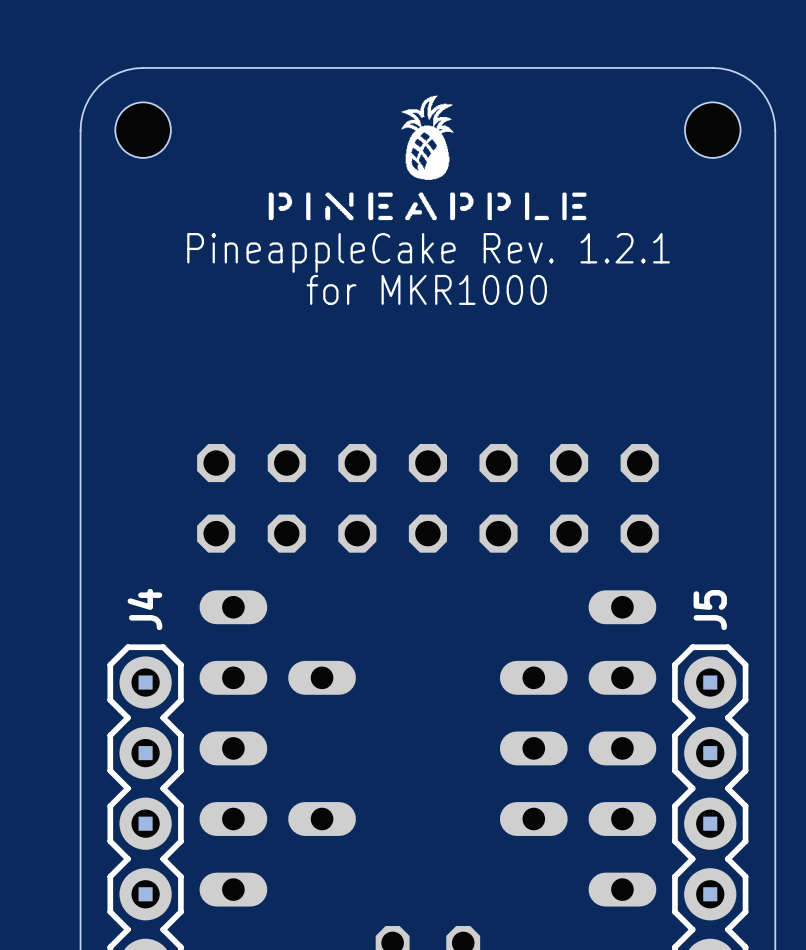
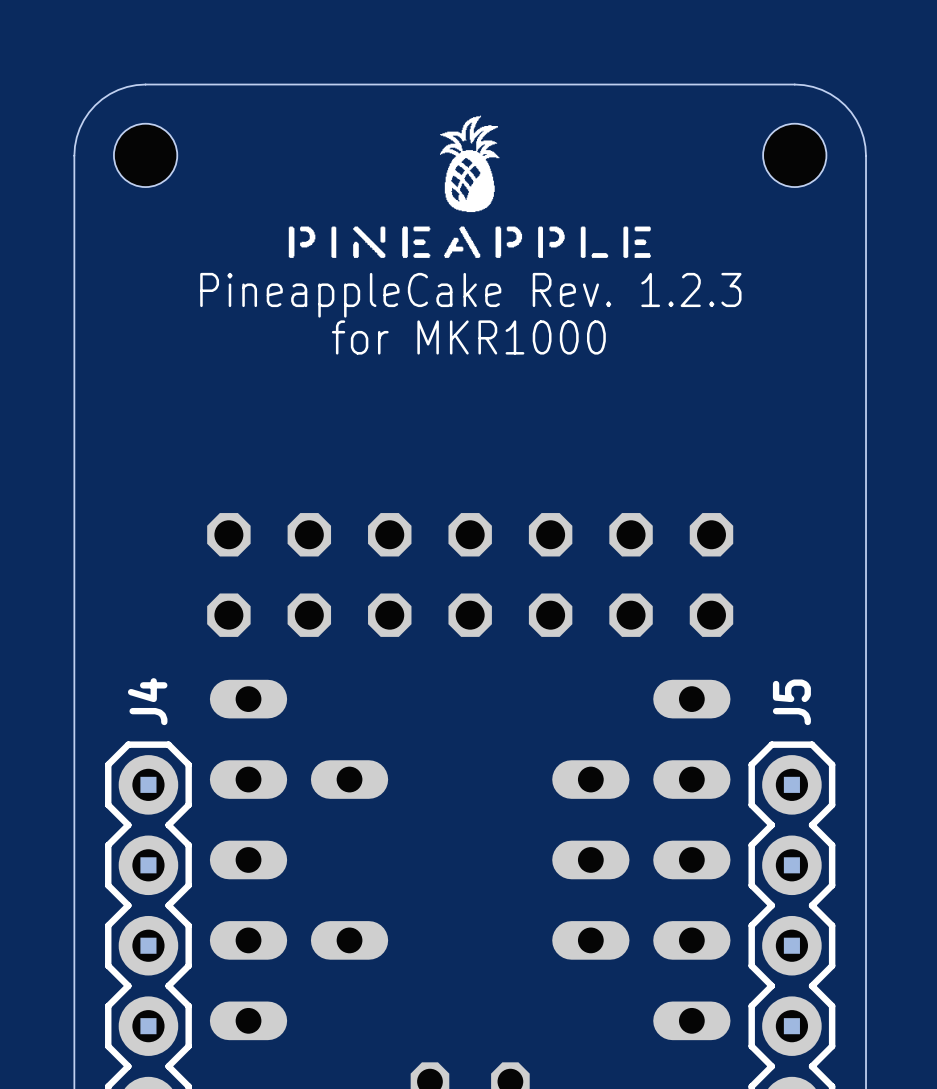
text: PineappleCake Rev. 1.2.1 (428, 252) -> PineappleCake Rev. 1.2.3 (470, 295)

